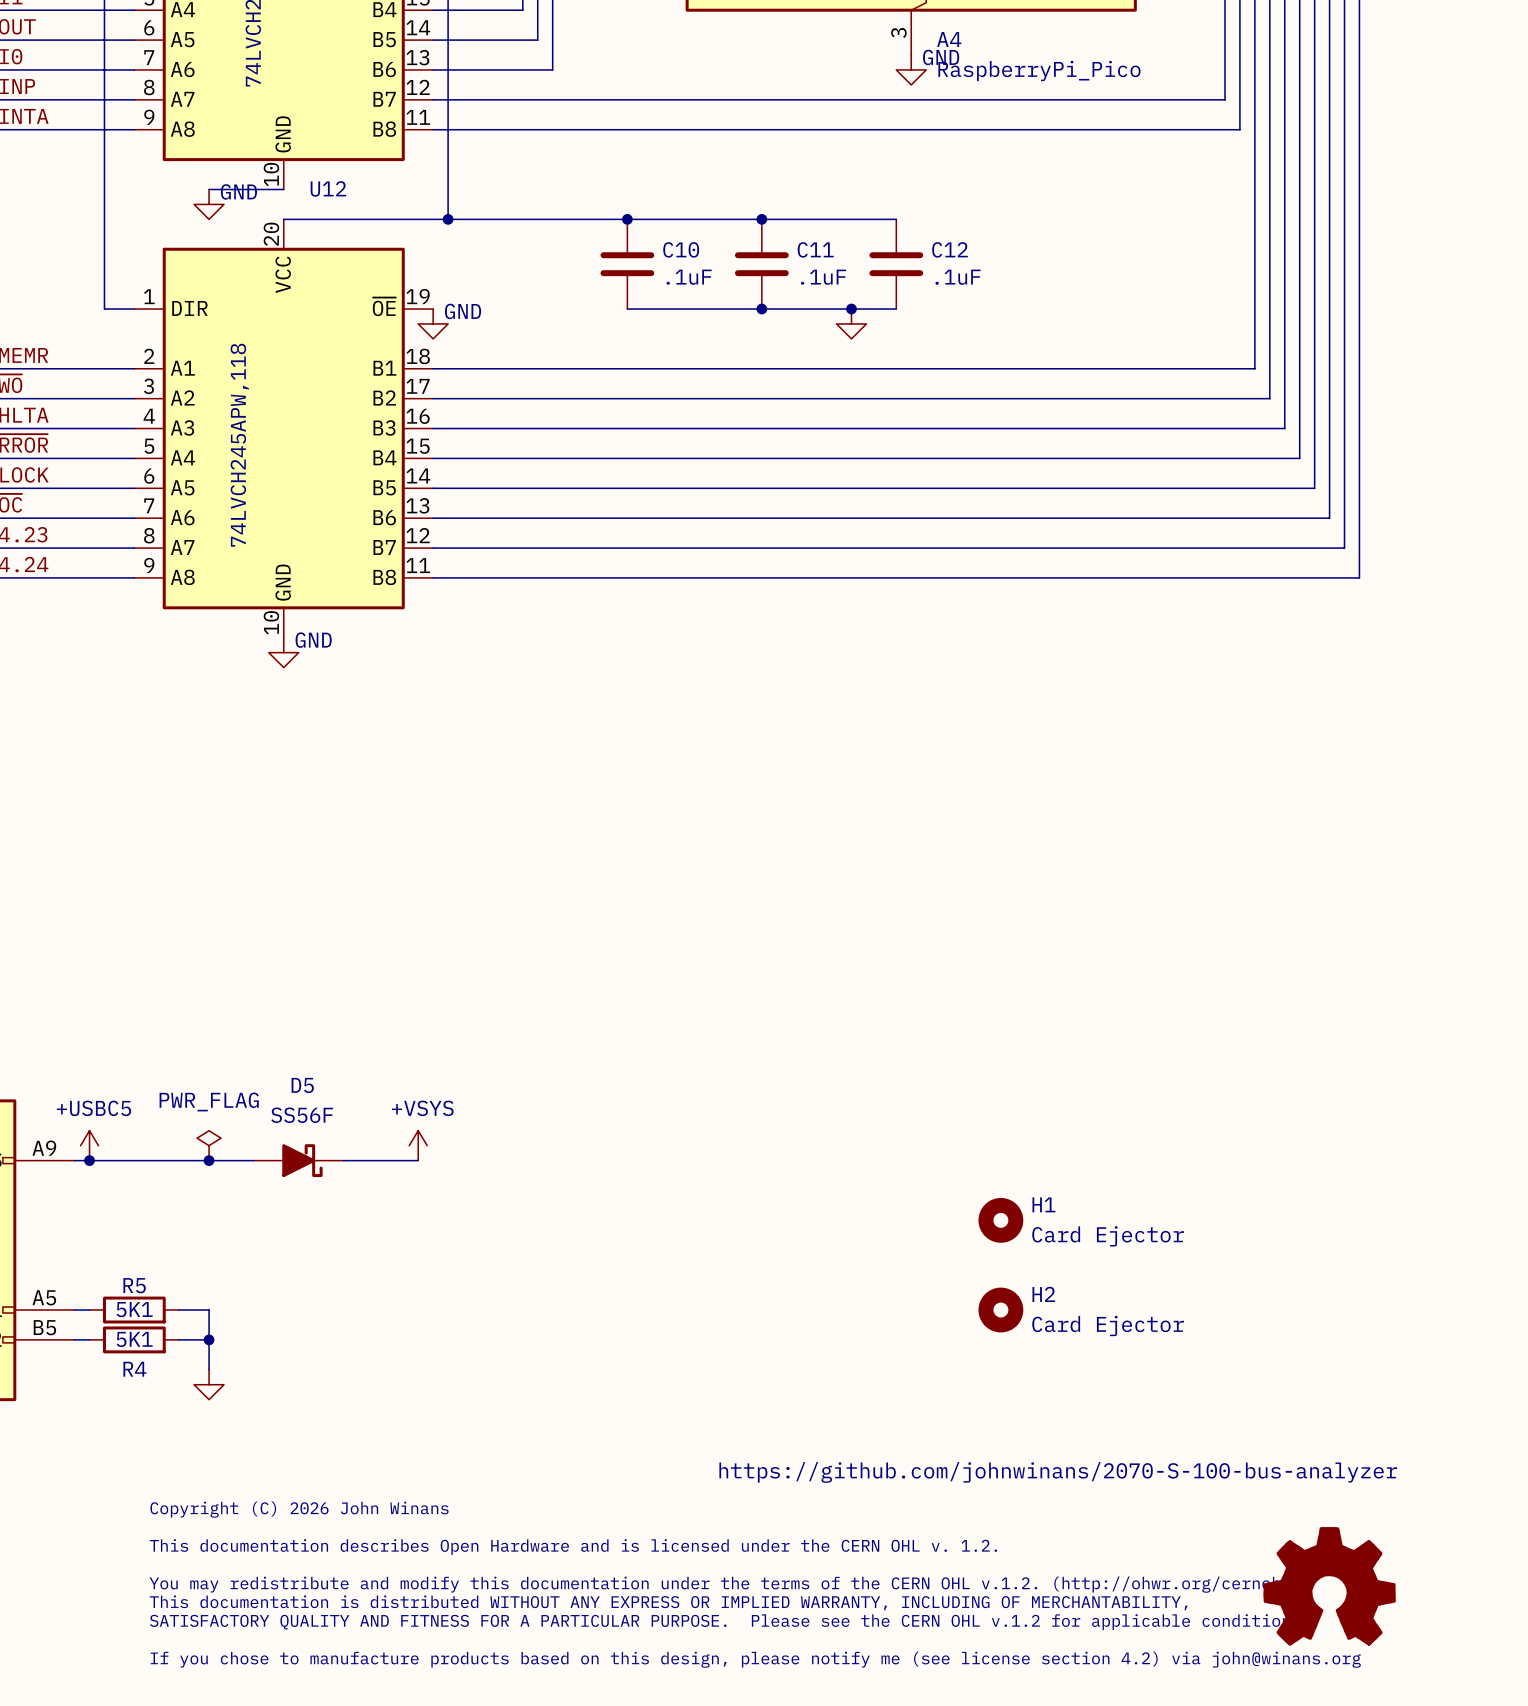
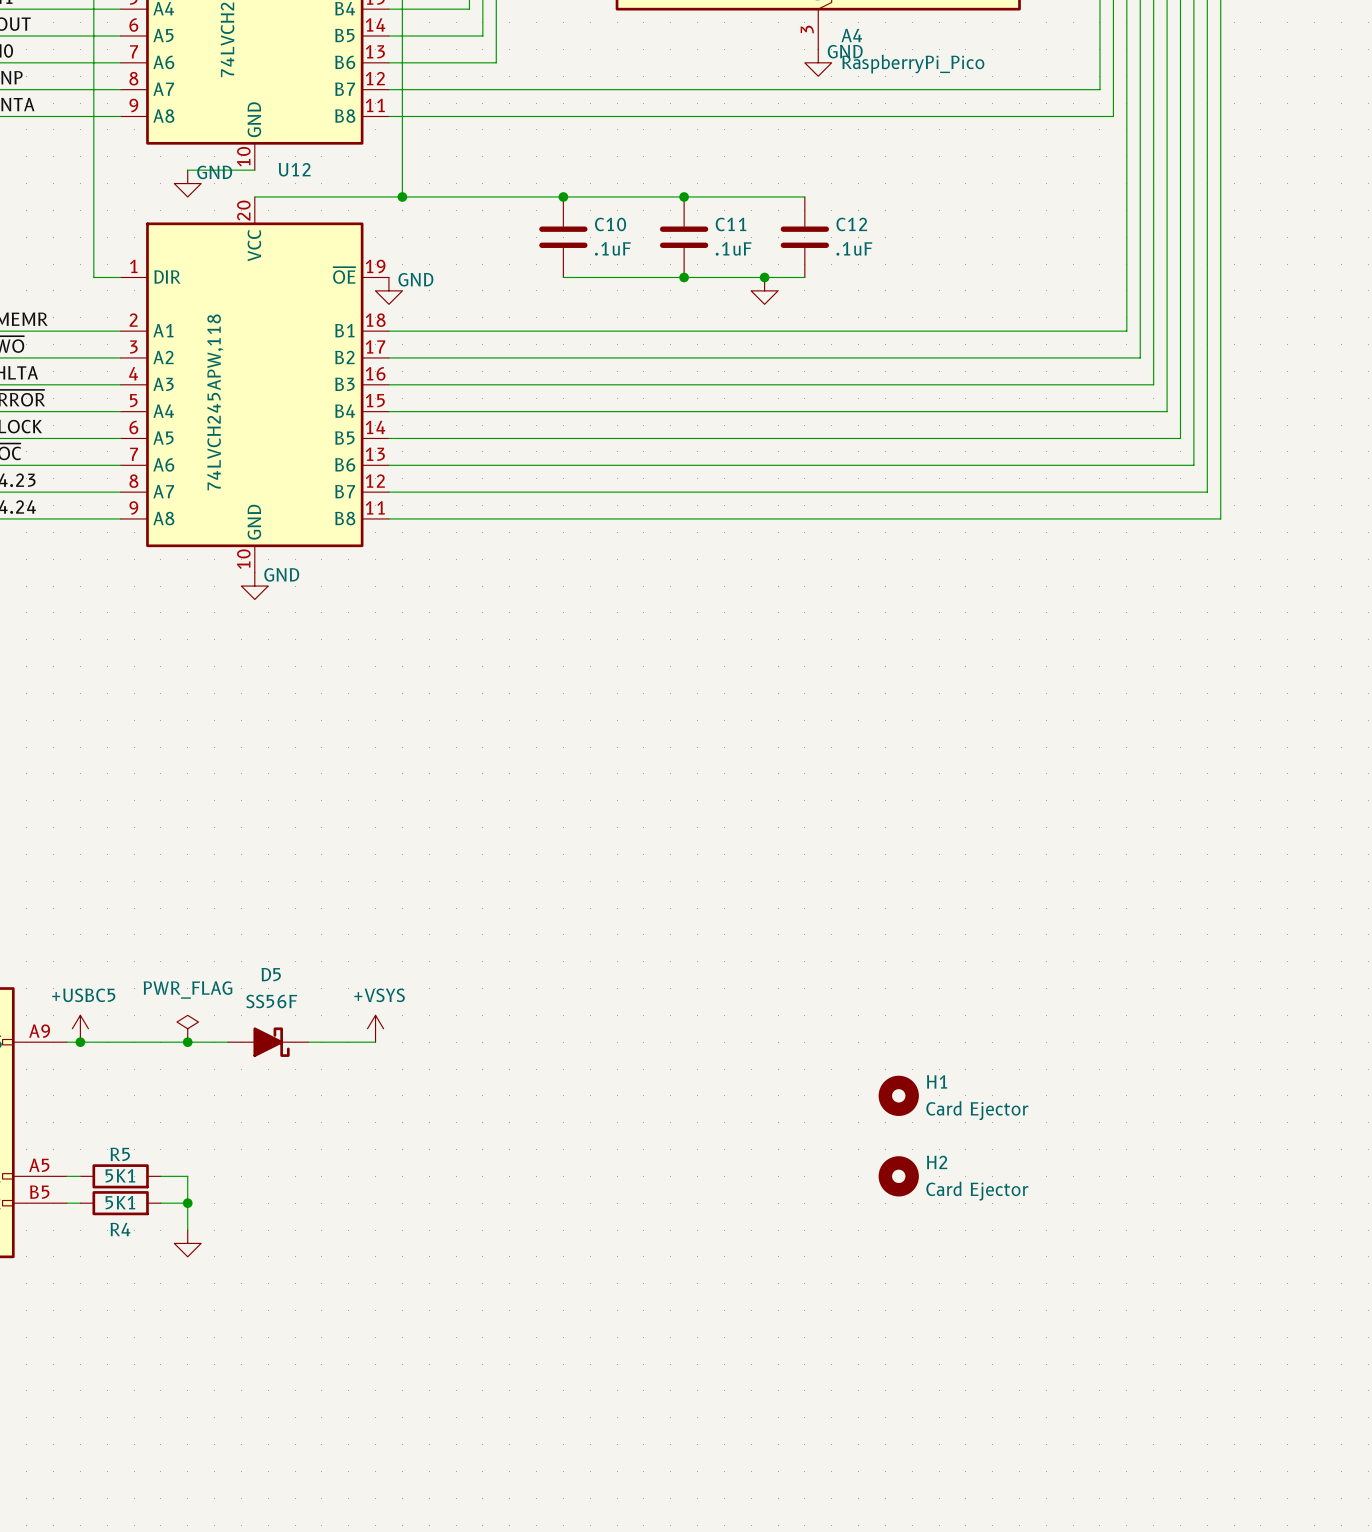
text: https://github.com/johnwinans/2070-S-100-bus-analyzer (1058, 1472) -> none
text: Copyright (C) 2026 John Winans (299, 1509) -> none
text: This documentation describes Open Hardware and is licensed under the CERN OHL v. 1.2. (573, 1547) -> none
text: You may redistribute and modify this documentation under the terms of the CERN OHL v.1.2. (http://ohwr.org/cernohl). (728, 1584) -> none
part: (1329, 1586) -> none
text: This documentation is distributed WITHOUT ANY EXPRESS OR IMPLIED WARRANTY, INCLUDING OF MERCHANTABILITY, (668, 1602) -> none
text: SATISFACTORY QUALITY AND FITNESS FOR A PARTICULAR PURPOSE. Please see the CERN OHL v.1.2 for applicable conditions (725, 1622) -> none
text: If you chose to manufacture products based on this design, please notify me (see license section 4.2) via john@winans.org (755, 1659) -> none

